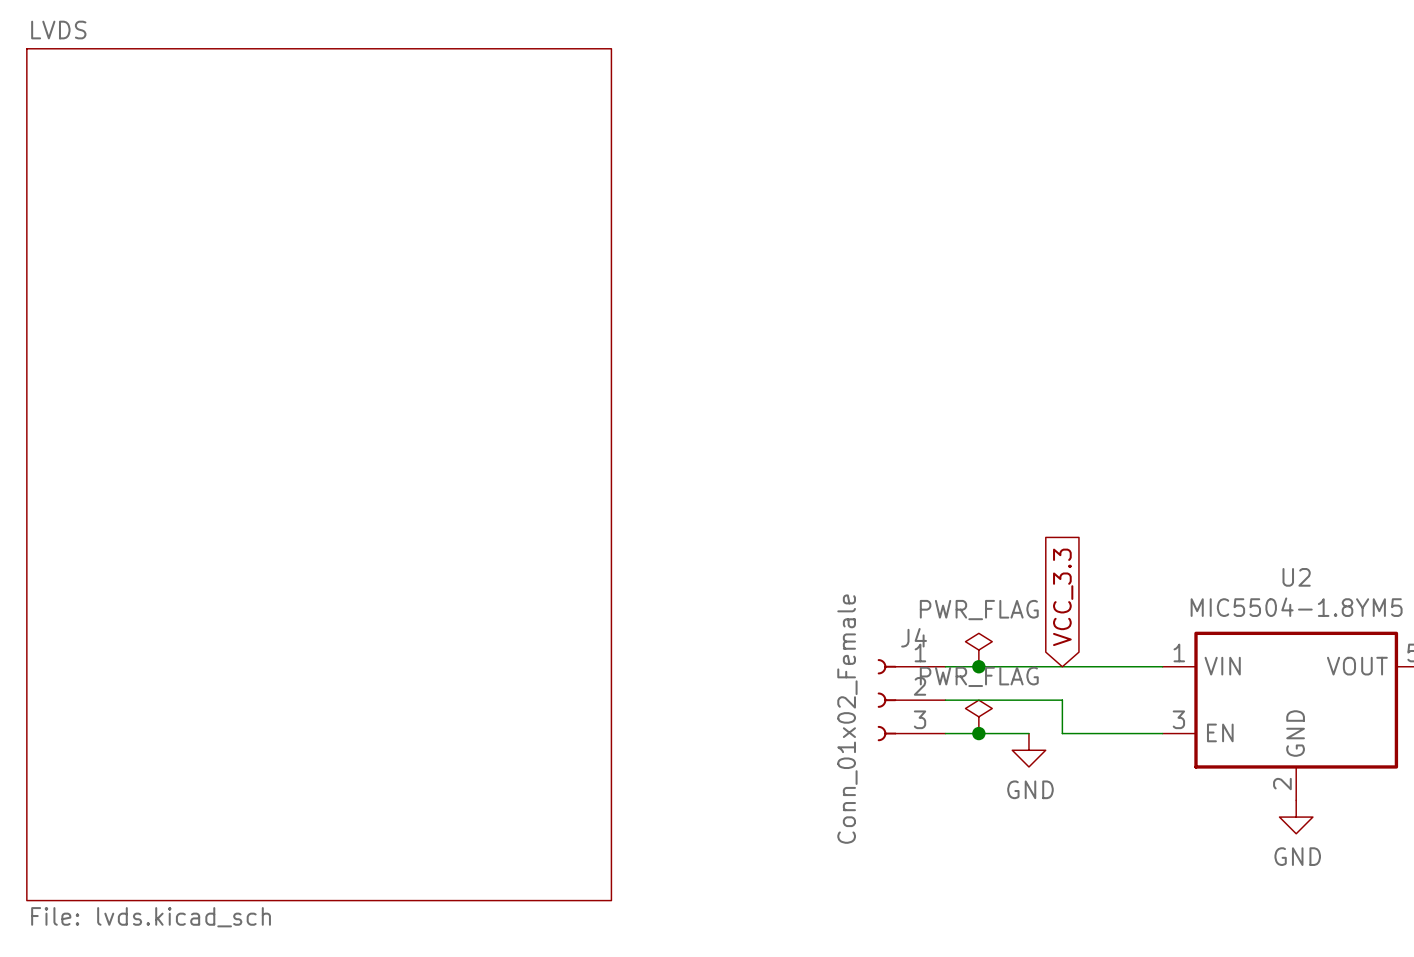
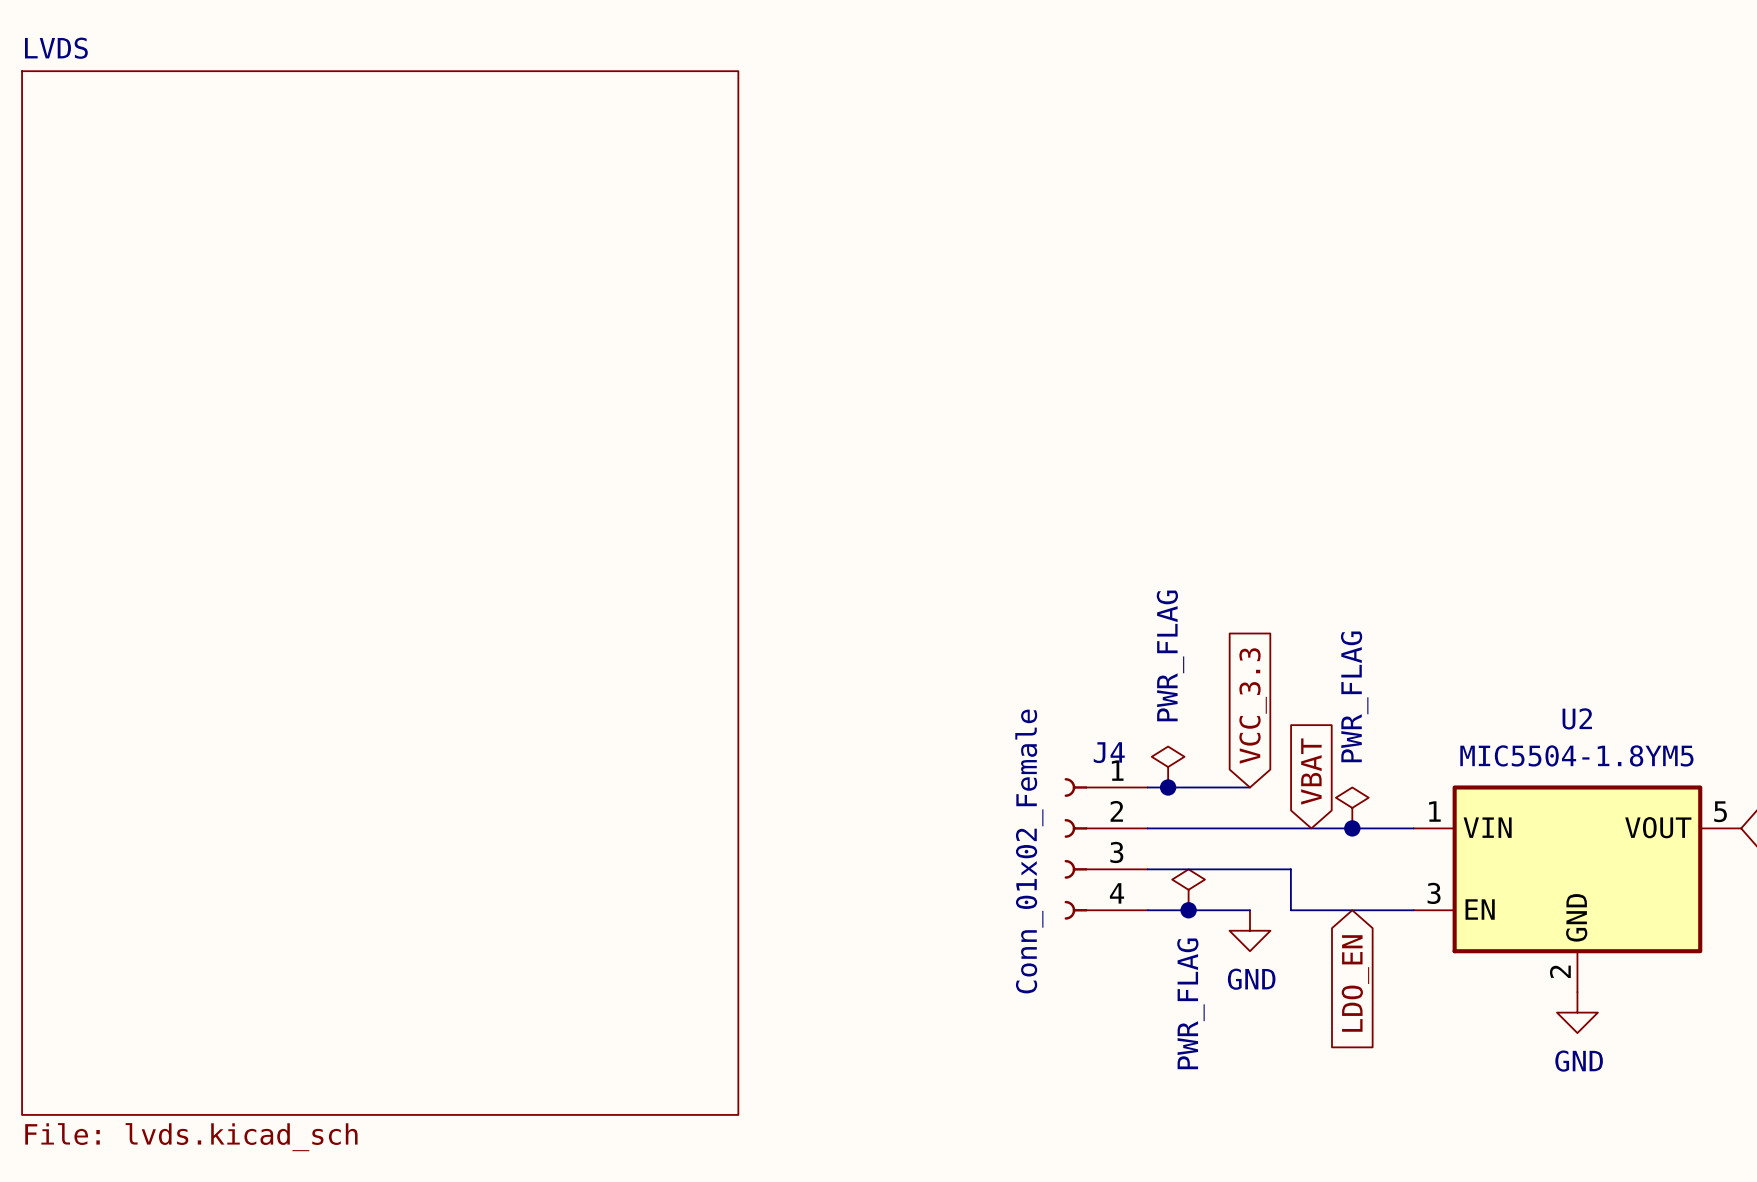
global label position: VCC_3.3 (1063, 597) -> VCC_3.3 (1253, 705)
power symbol text rotation: 0° (979, 610) -> 90° counterclockwise (1170, 655)
global label: none -> VBAT (1311, 771)
wire: none -> (1147, 787) (1249, 787)
power symbol position: PWR_FLAG (978, 650) -> PWR_FLAG (1168, 767)
power symbol: none -> PWR_FLAG (1352, 807)
J4 symbol: [877, 659, 946, 742] -> [1064, 778, 1148, 920]
junction position: (978, 666) -> (1168, 787)
junction: none -> (1352, 828)
power symbol text rotation: 0° (979, 676) -> 90° counterclockwise (1190, 1003)
global label: none -> LDO_EN (1355, 983)

